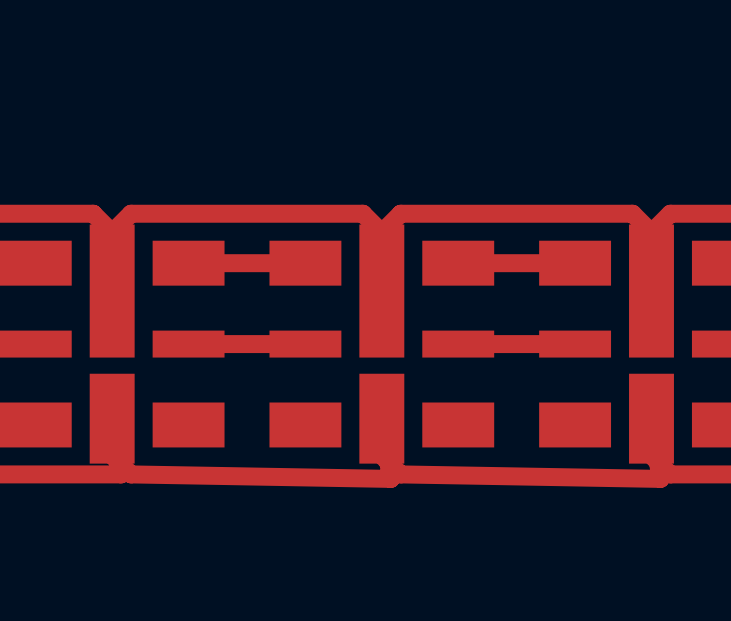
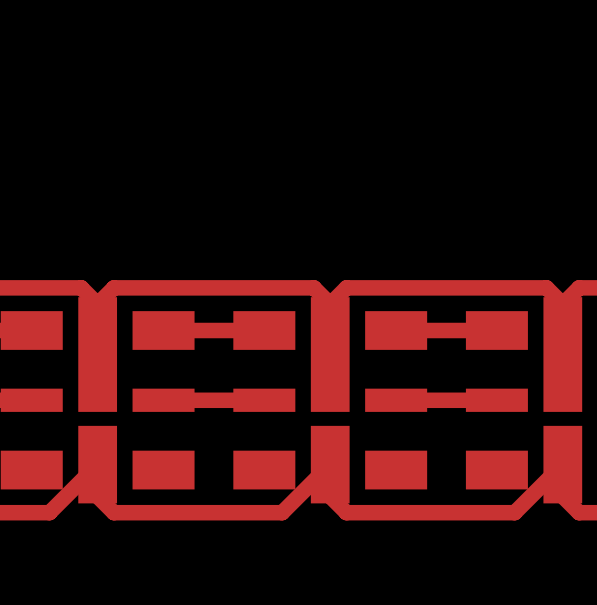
top track: (112, 418) (121, 474) (56, 474) -> (97, 464) (49, 512)
top track: (381, 418) (390, 478) (131, 474) -> (330, 464) (282, 512) (113, 512)
top track: (651, 418) (660, 478) (400, 474) -> (562, 464) (514, 512) (346, 512)

